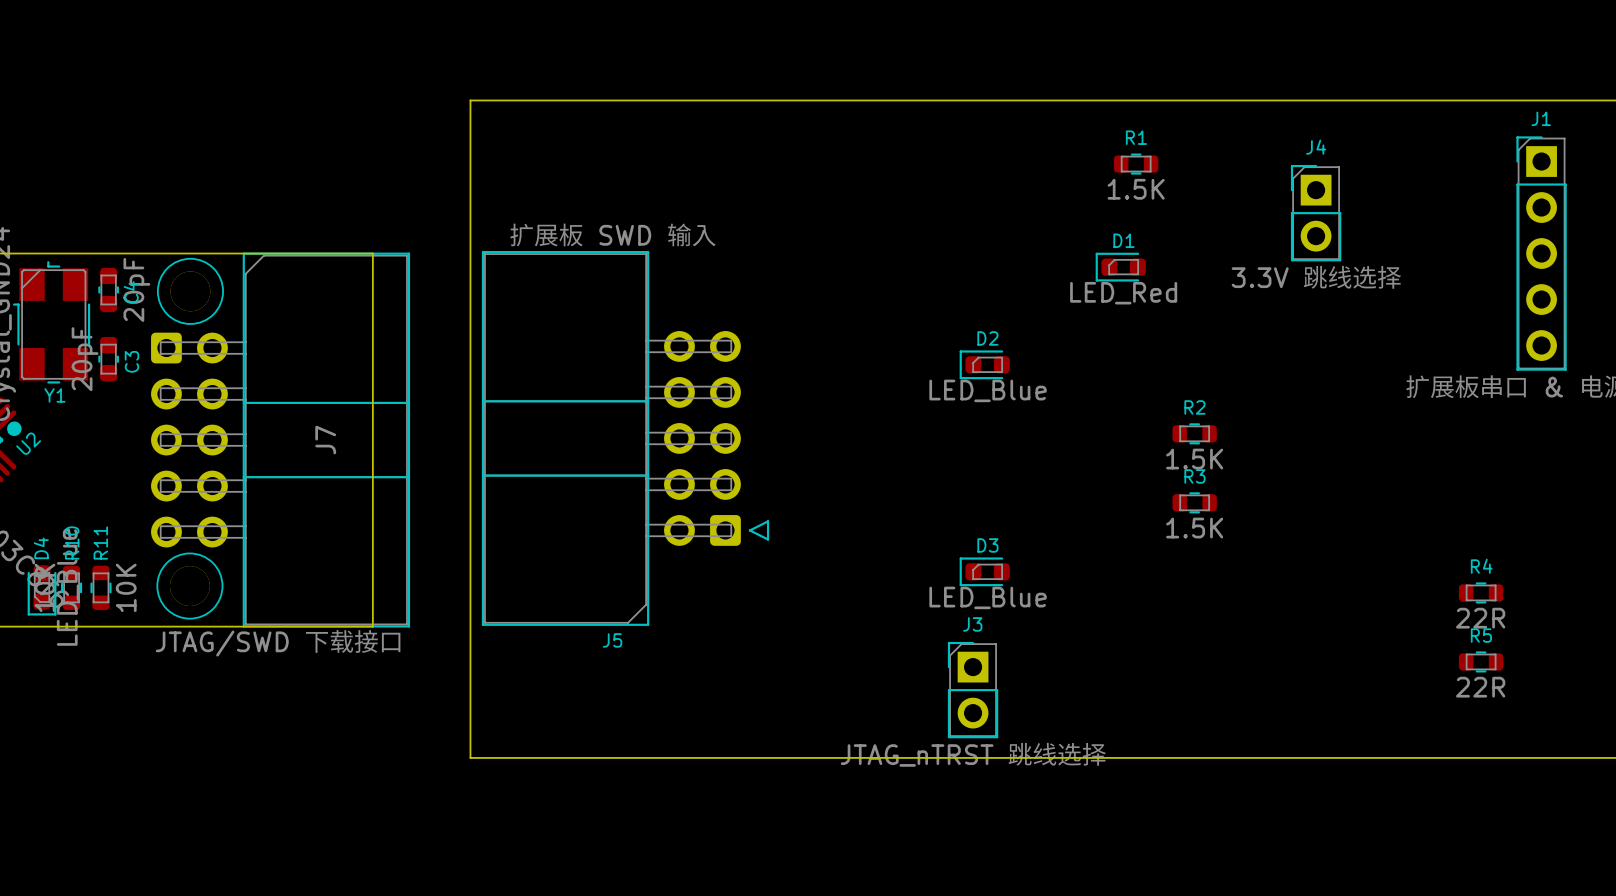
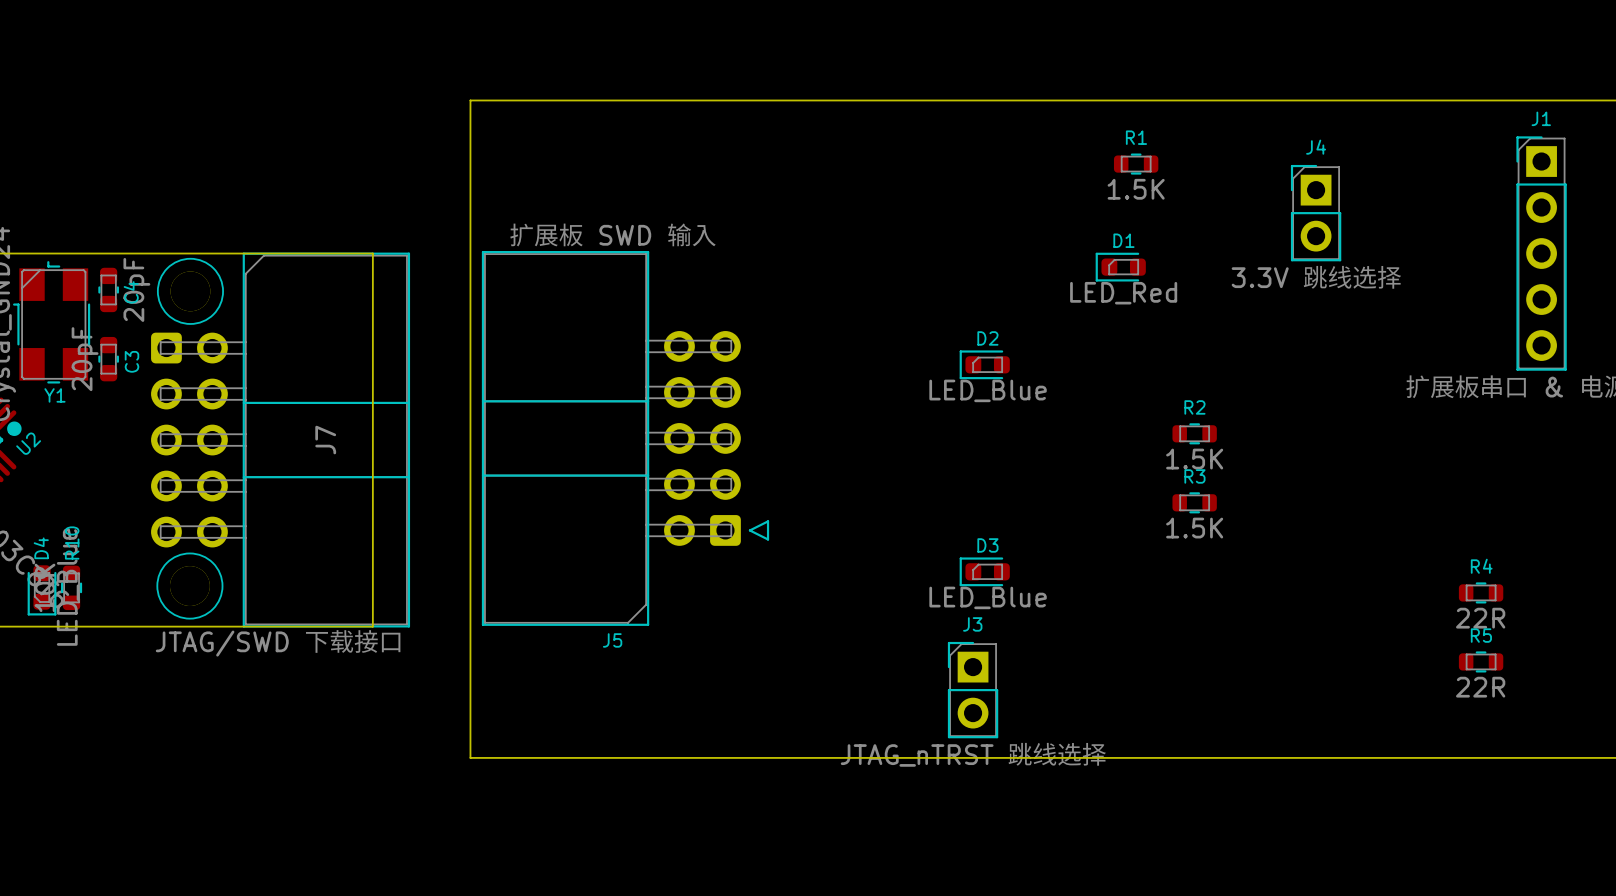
R11: 10K (100, 587) -> none

